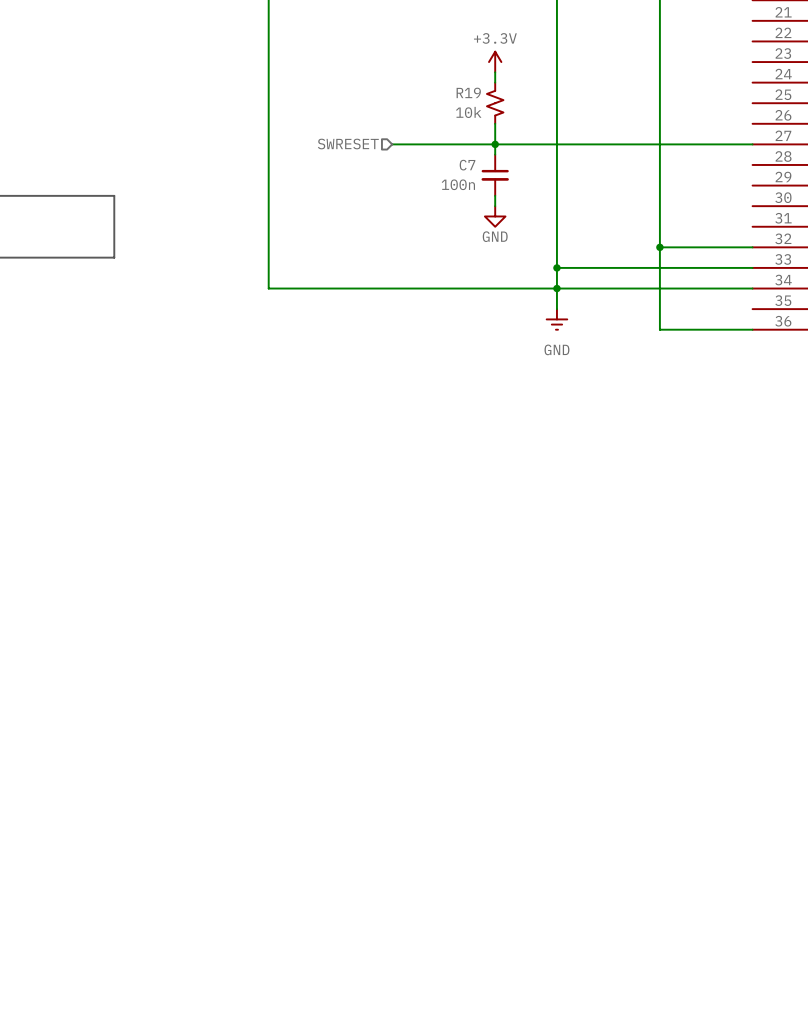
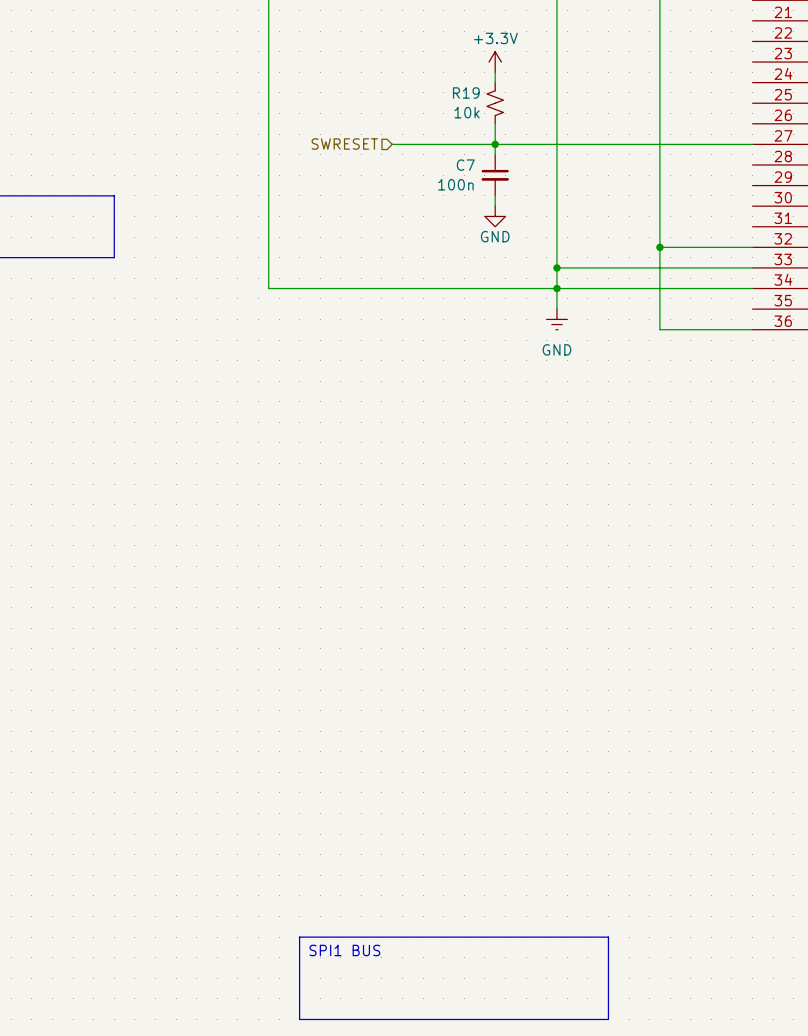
line: none -> (299, 937) (608, 937) (608, 1019) (299, 1019) (299, 937)
text: none -> SPI1 BUS (344, 950)

